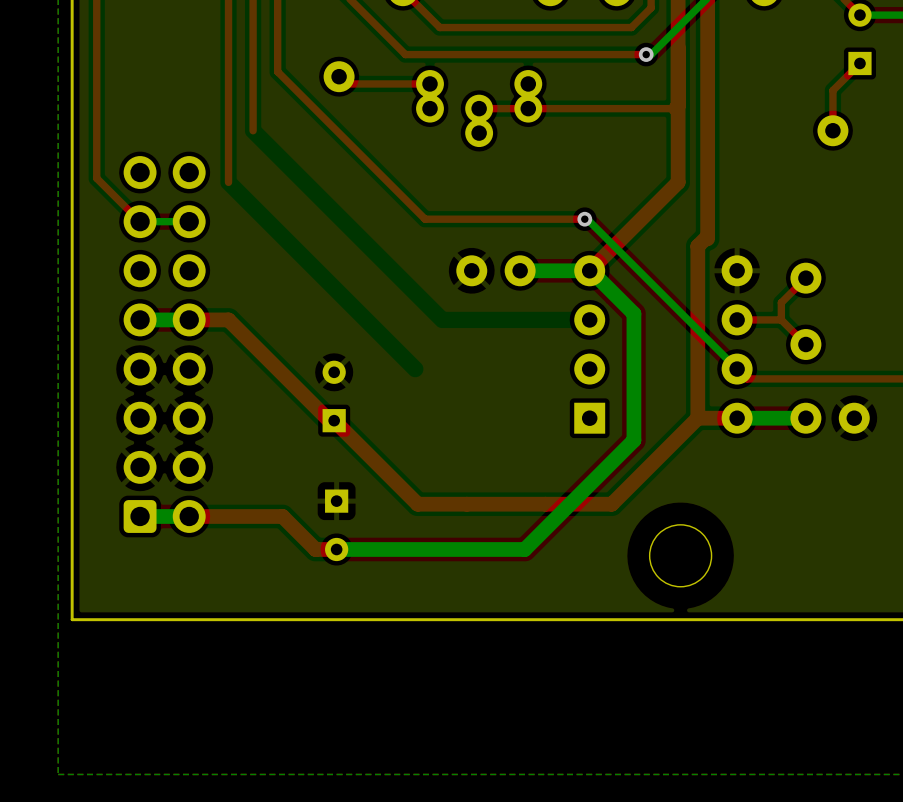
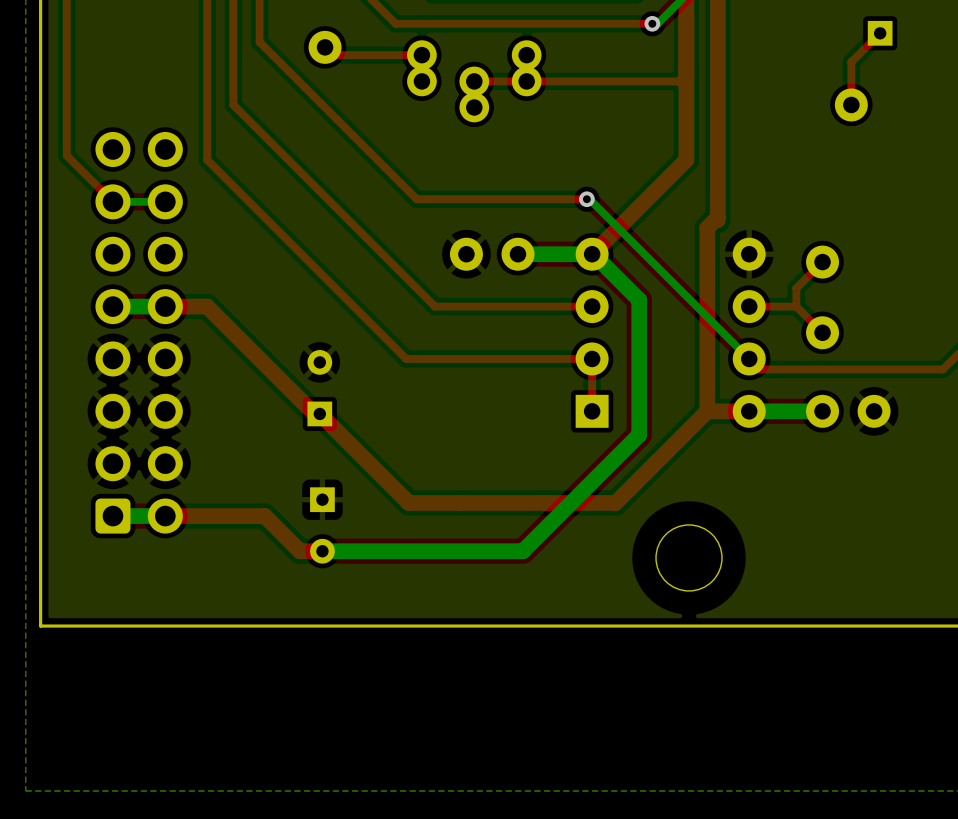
top track: none -> (233, 104) (435, 306) (592, 306)
top track: none -> (207, 159) (406, 358) (592, 358)
top track: none -> (592, 371) (592, 411)

